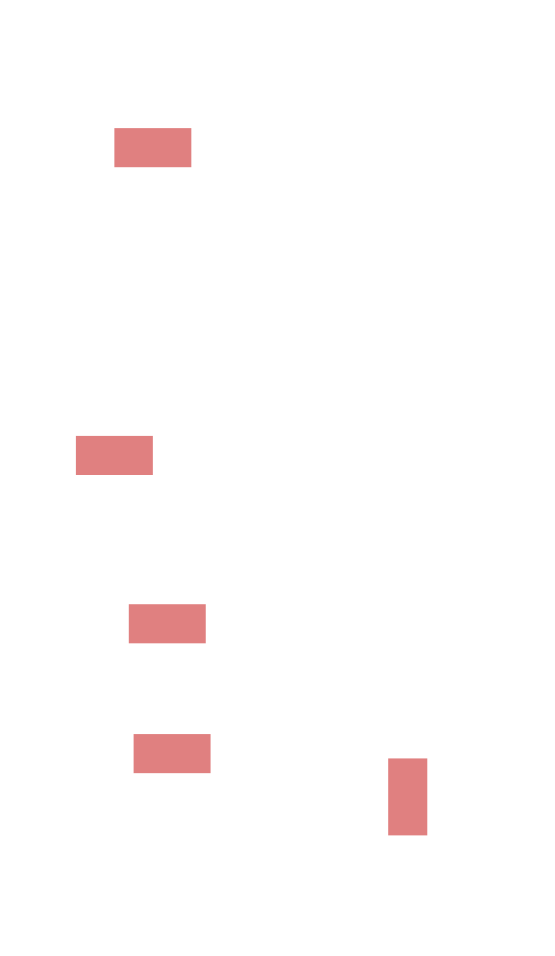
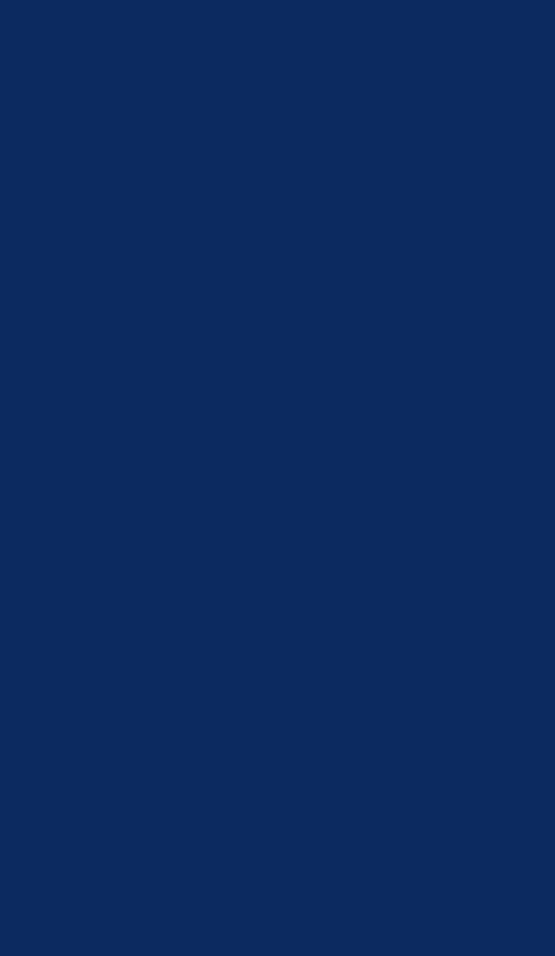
part: (152, 147) -> none
part: (114, 455) -> none
part: (167, 623) -> none
part: (172, 753) -> none
part: (407, 796) -> none

